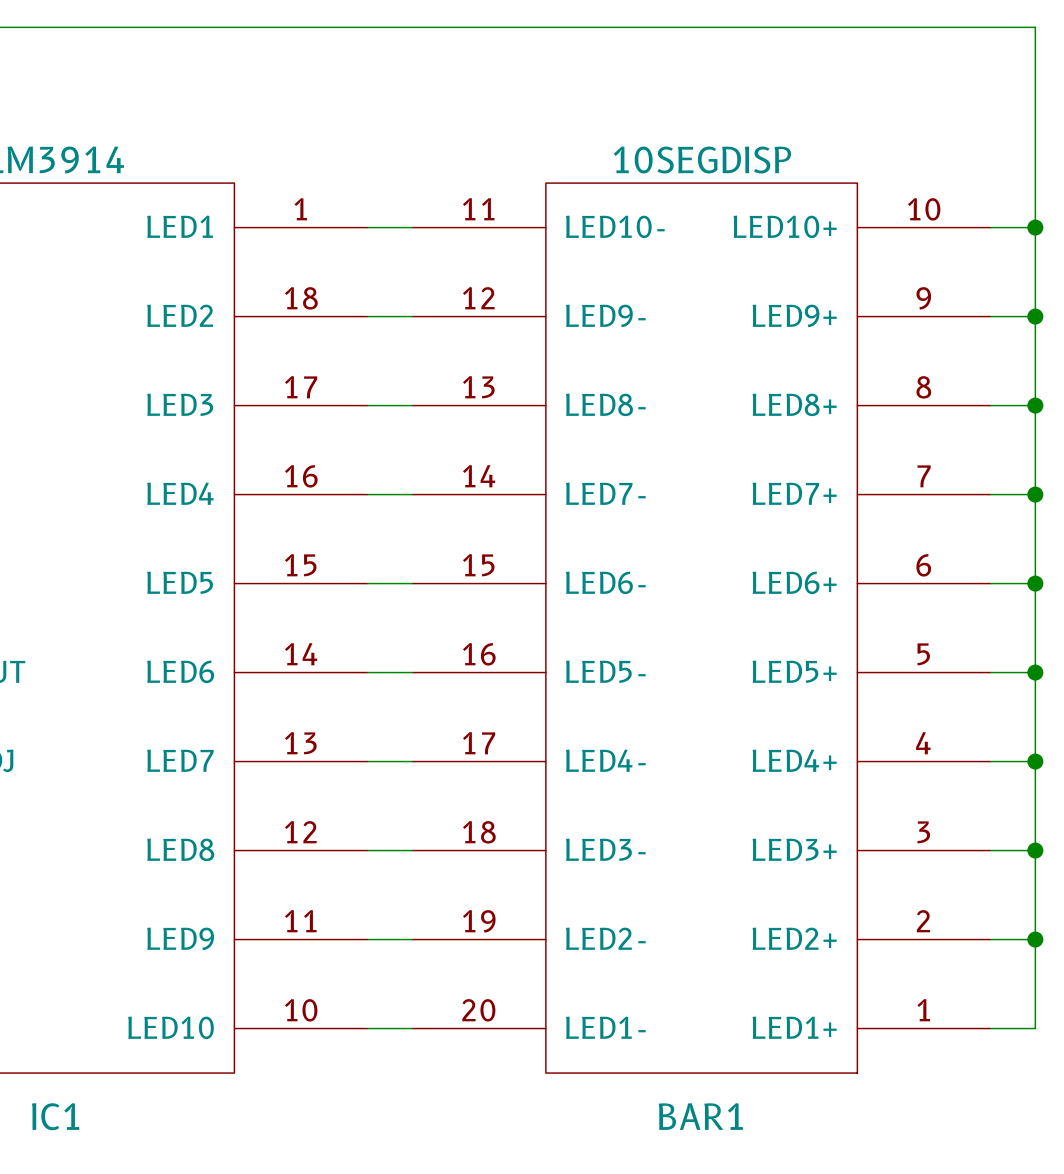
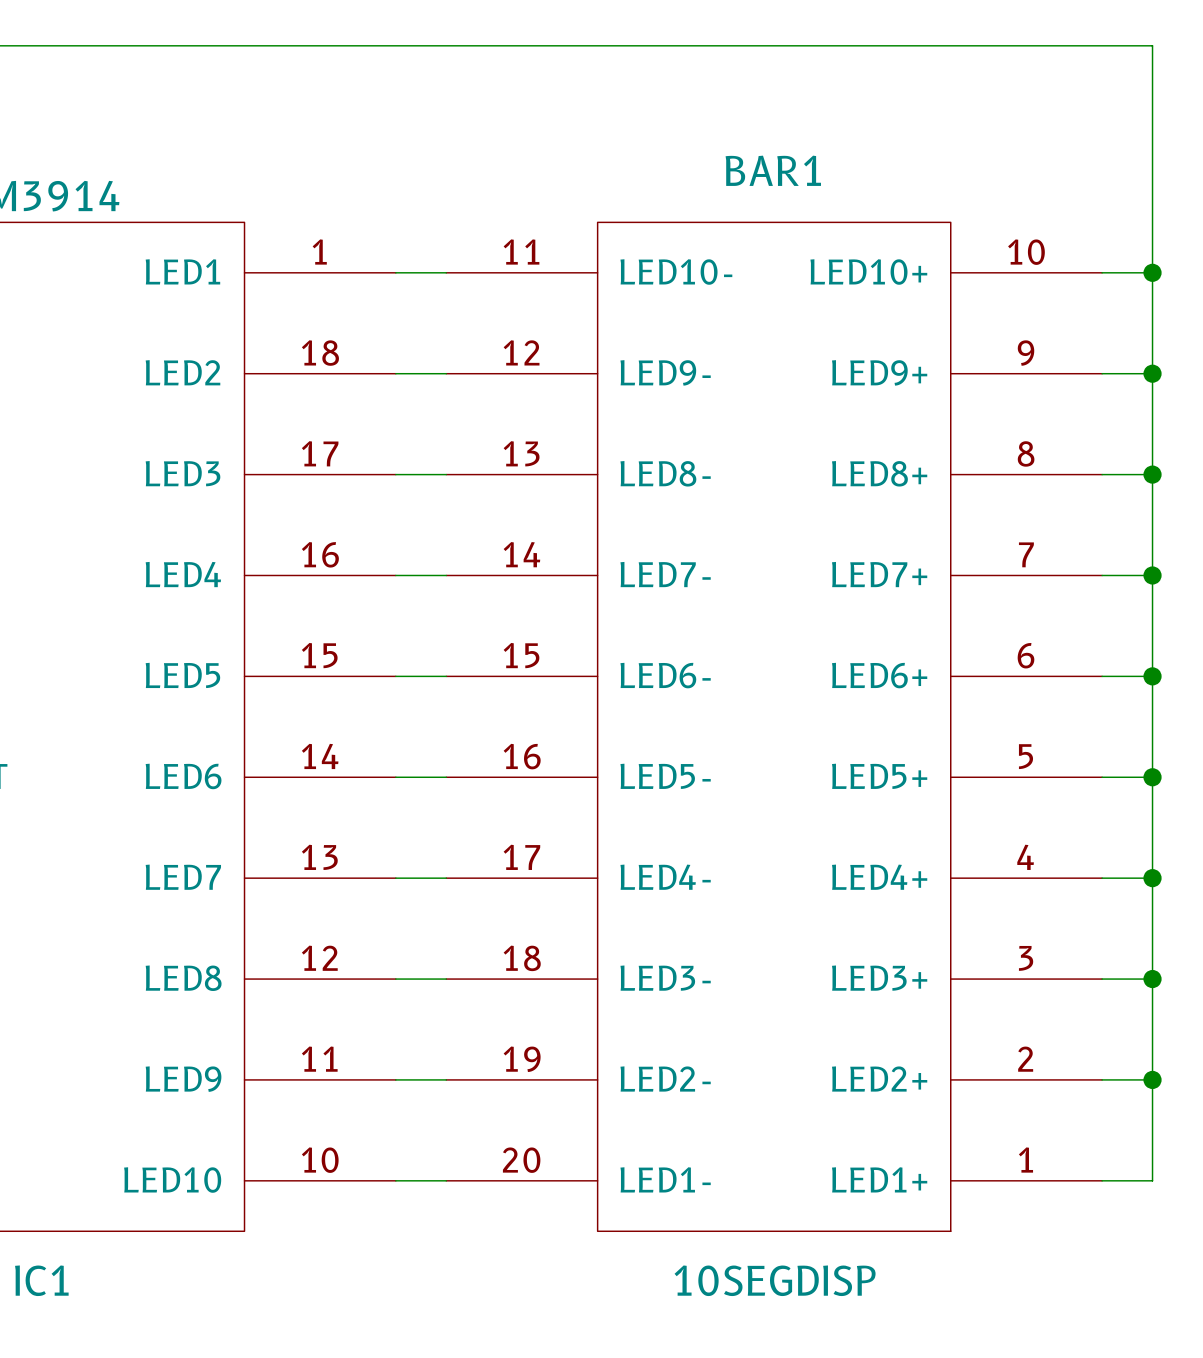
BAR1 value position: 10SEGDISP (702, 159) -> 10SEGDISP (775, 1280)
BAR1 name position: BAR1 (700, 1116) -> BAR1 (773, 170)

